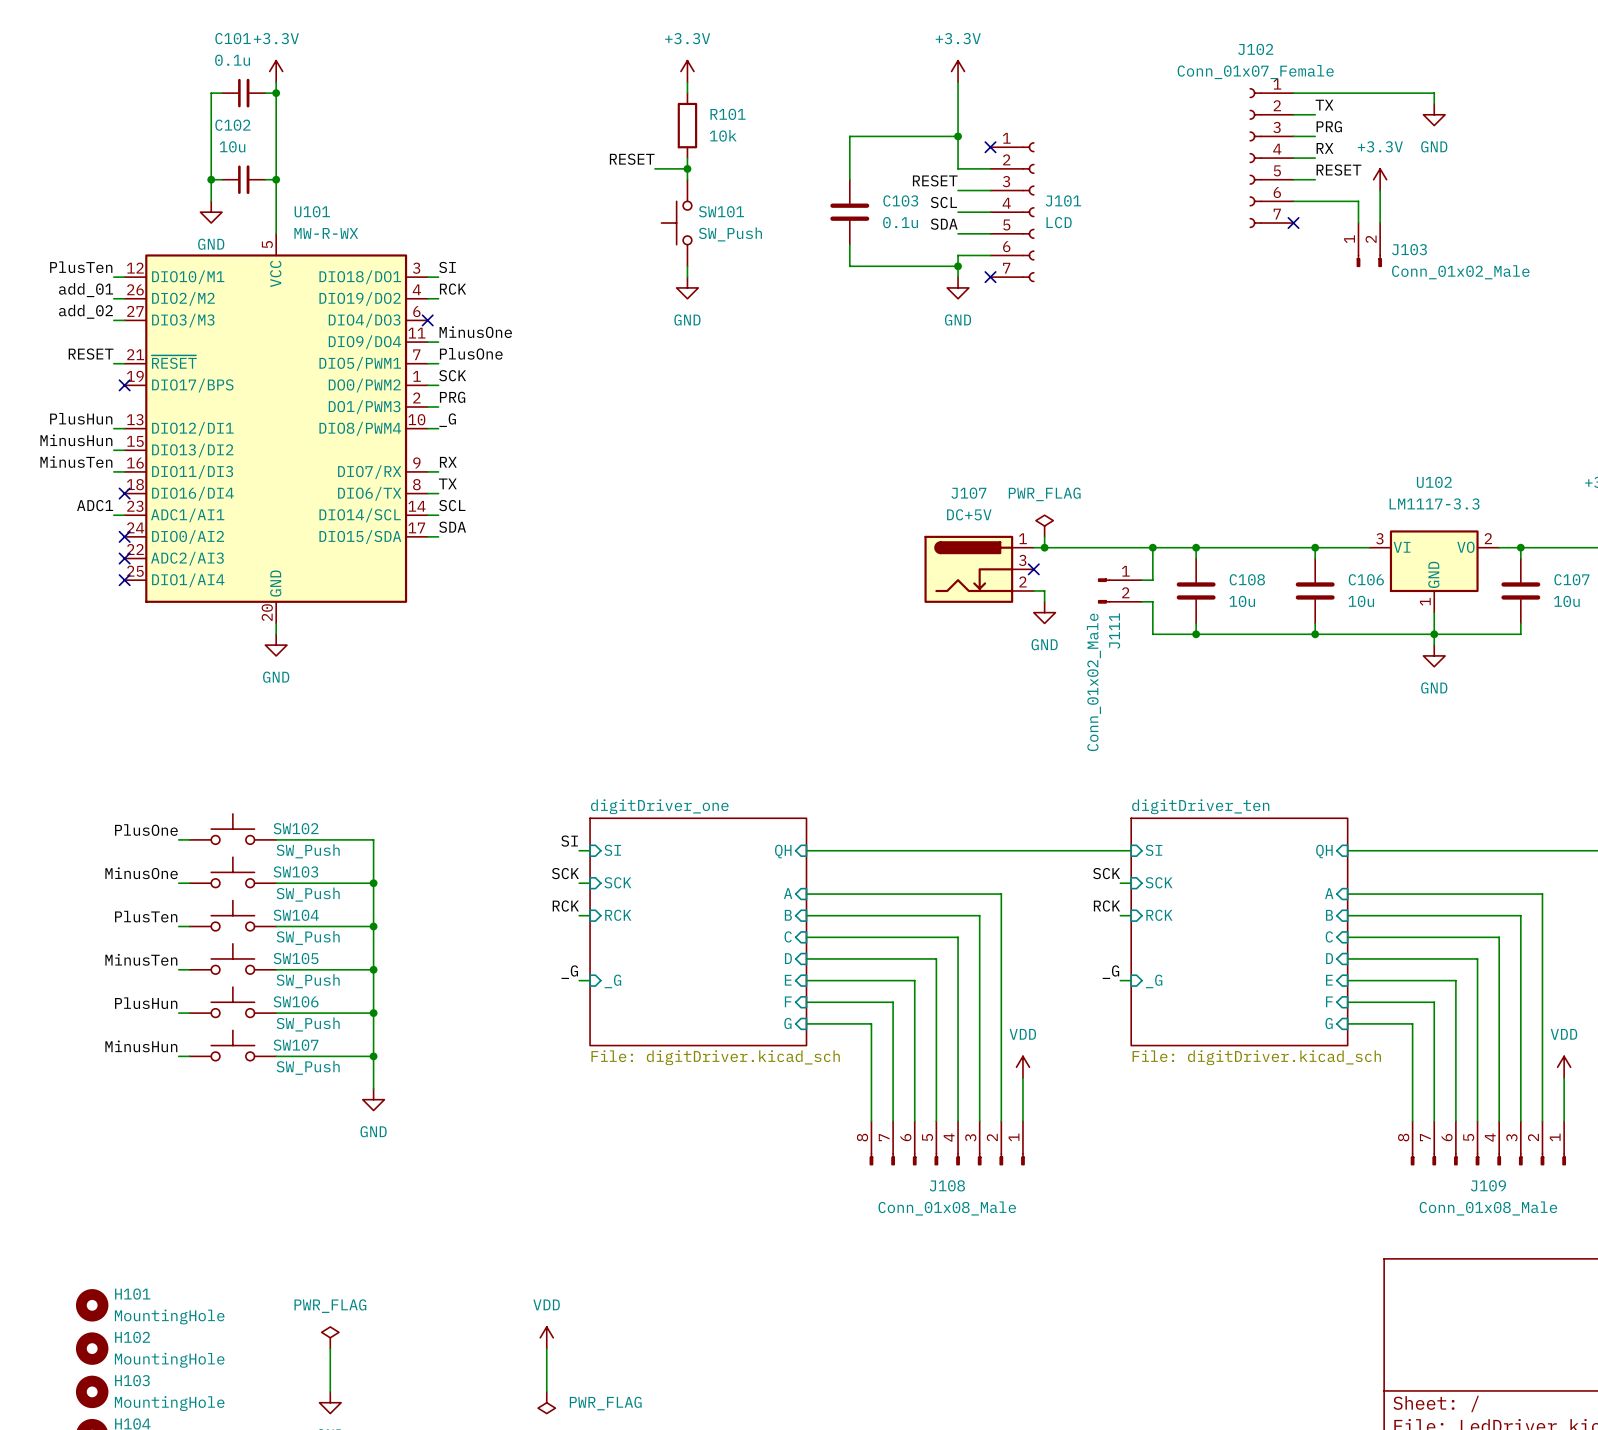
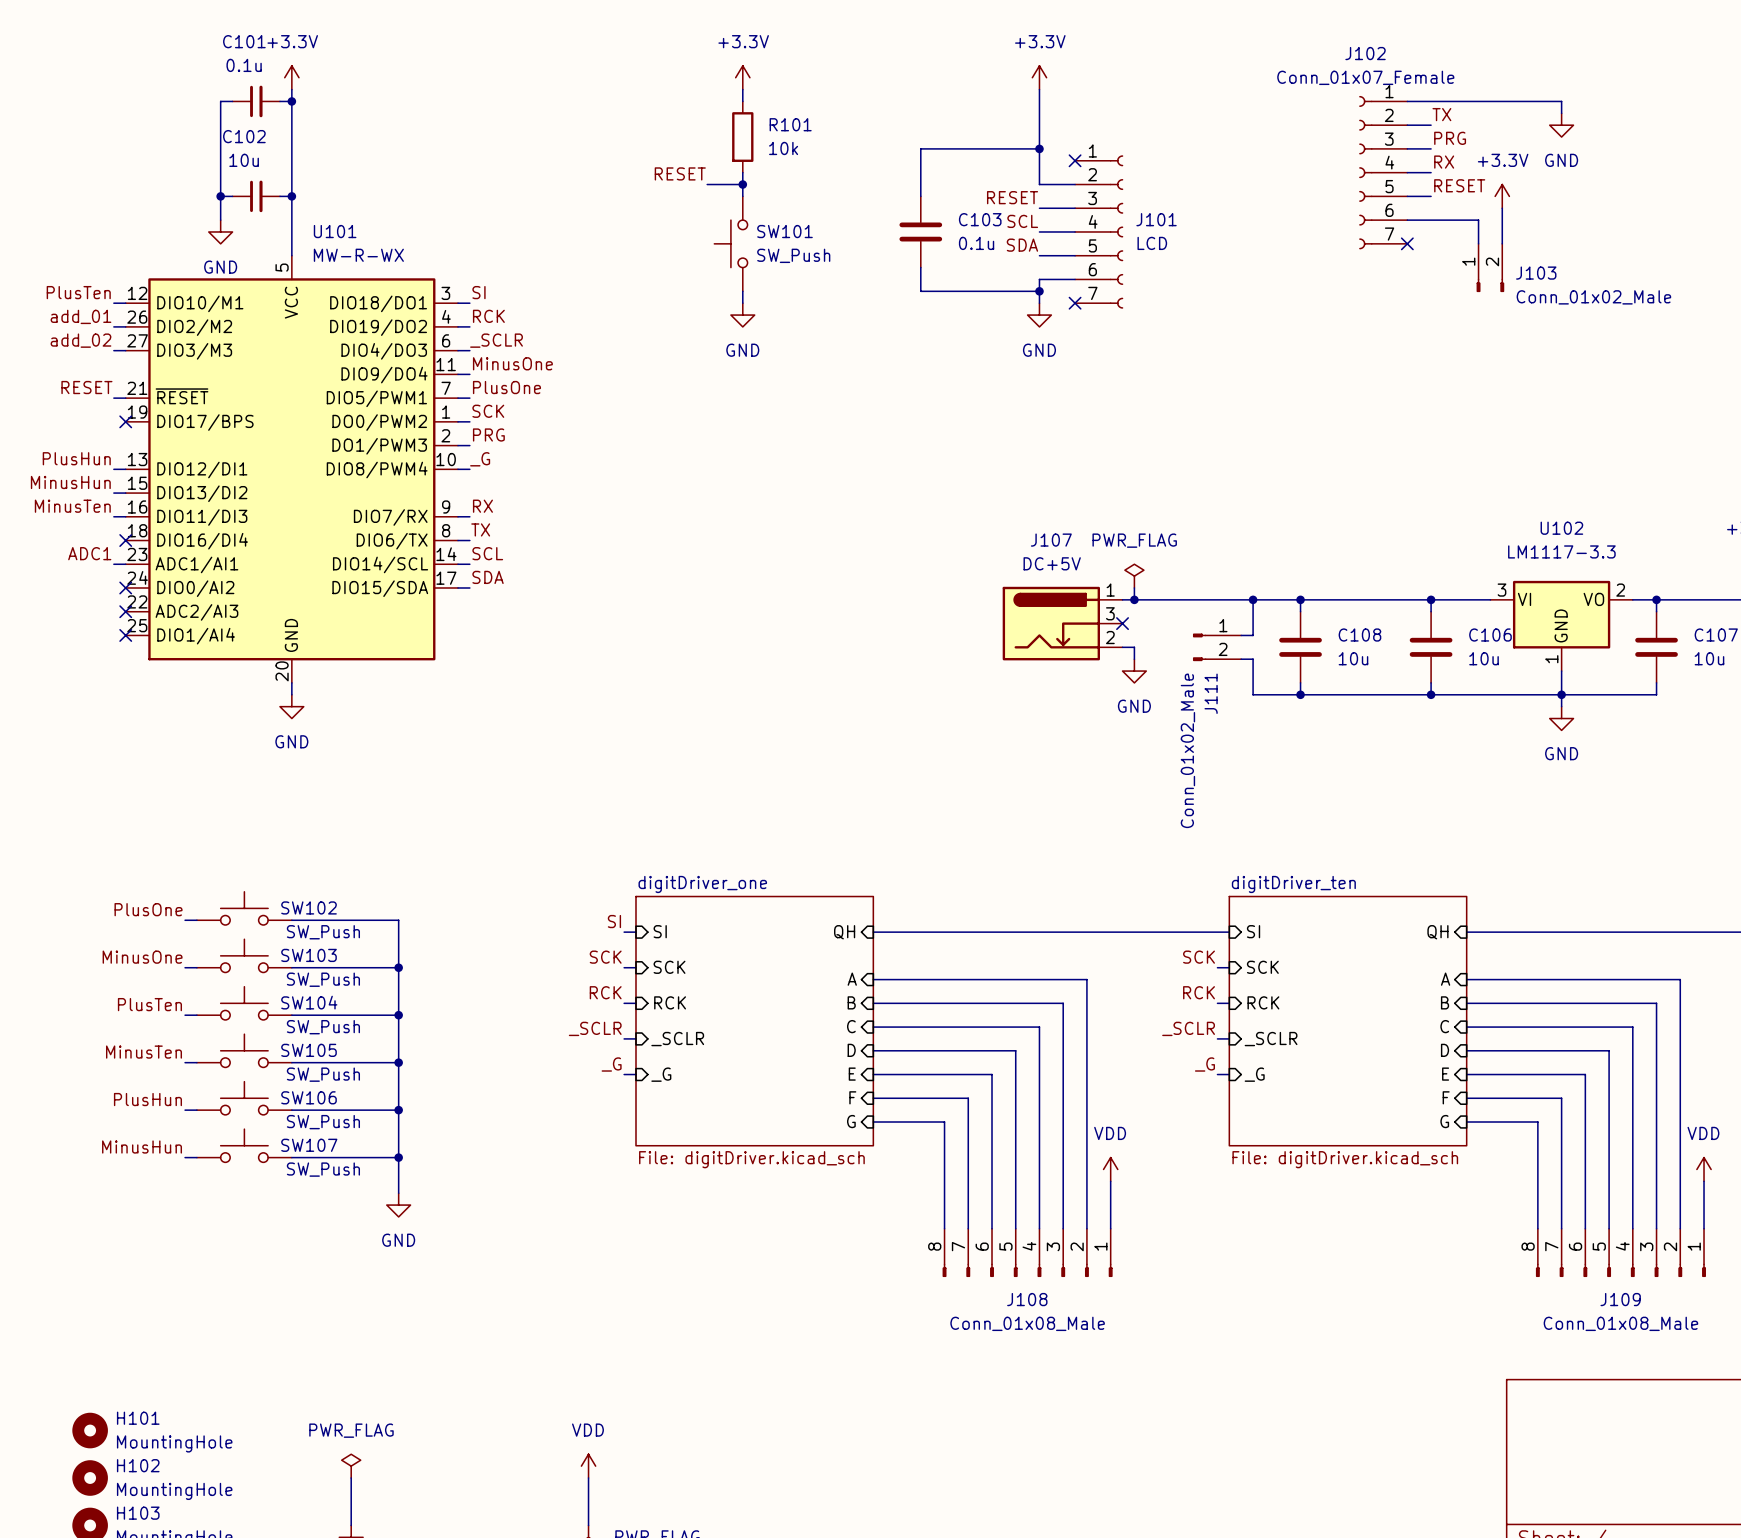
label: none -> _SCLR (496, 340)
wire: none -> (457, 350) (469, 350)
no-connect mark: (427, 320) -> none
label: none -> _SCLR (595, 1028)
label: none -> _SCLR (1188, 1028)
wire: none -> (624, 1038) (635, 1038)
sheet pin: none -> _SCLR (677, 1039)
wire: none -> (1217, 1038) (1229, 1038)
sheet pin: none -> _SCLR (1271, 1039)

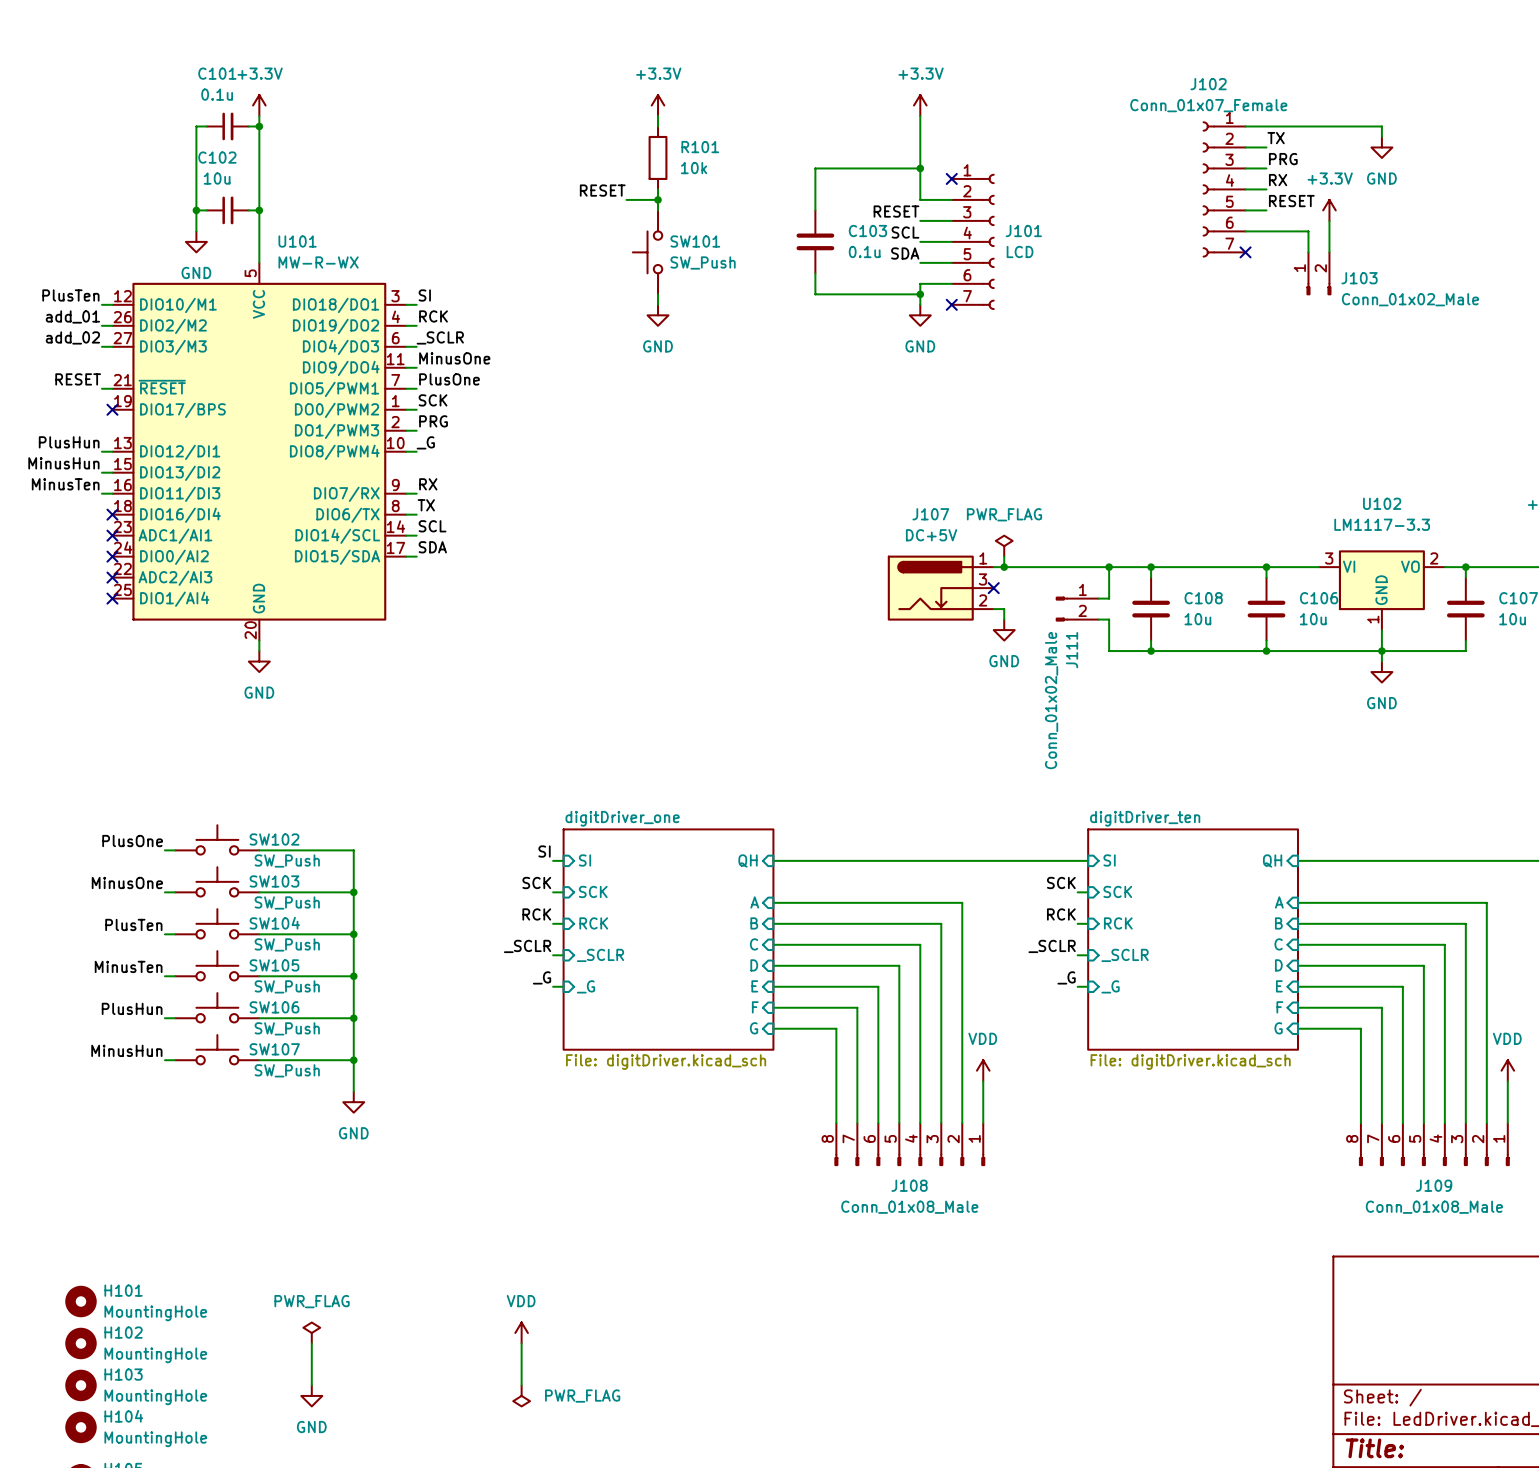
label: ADC1 (89, 553) -> none
wire: (113, 564) (125, 564) -> none
no-connect mark: none -> (112, 535)

